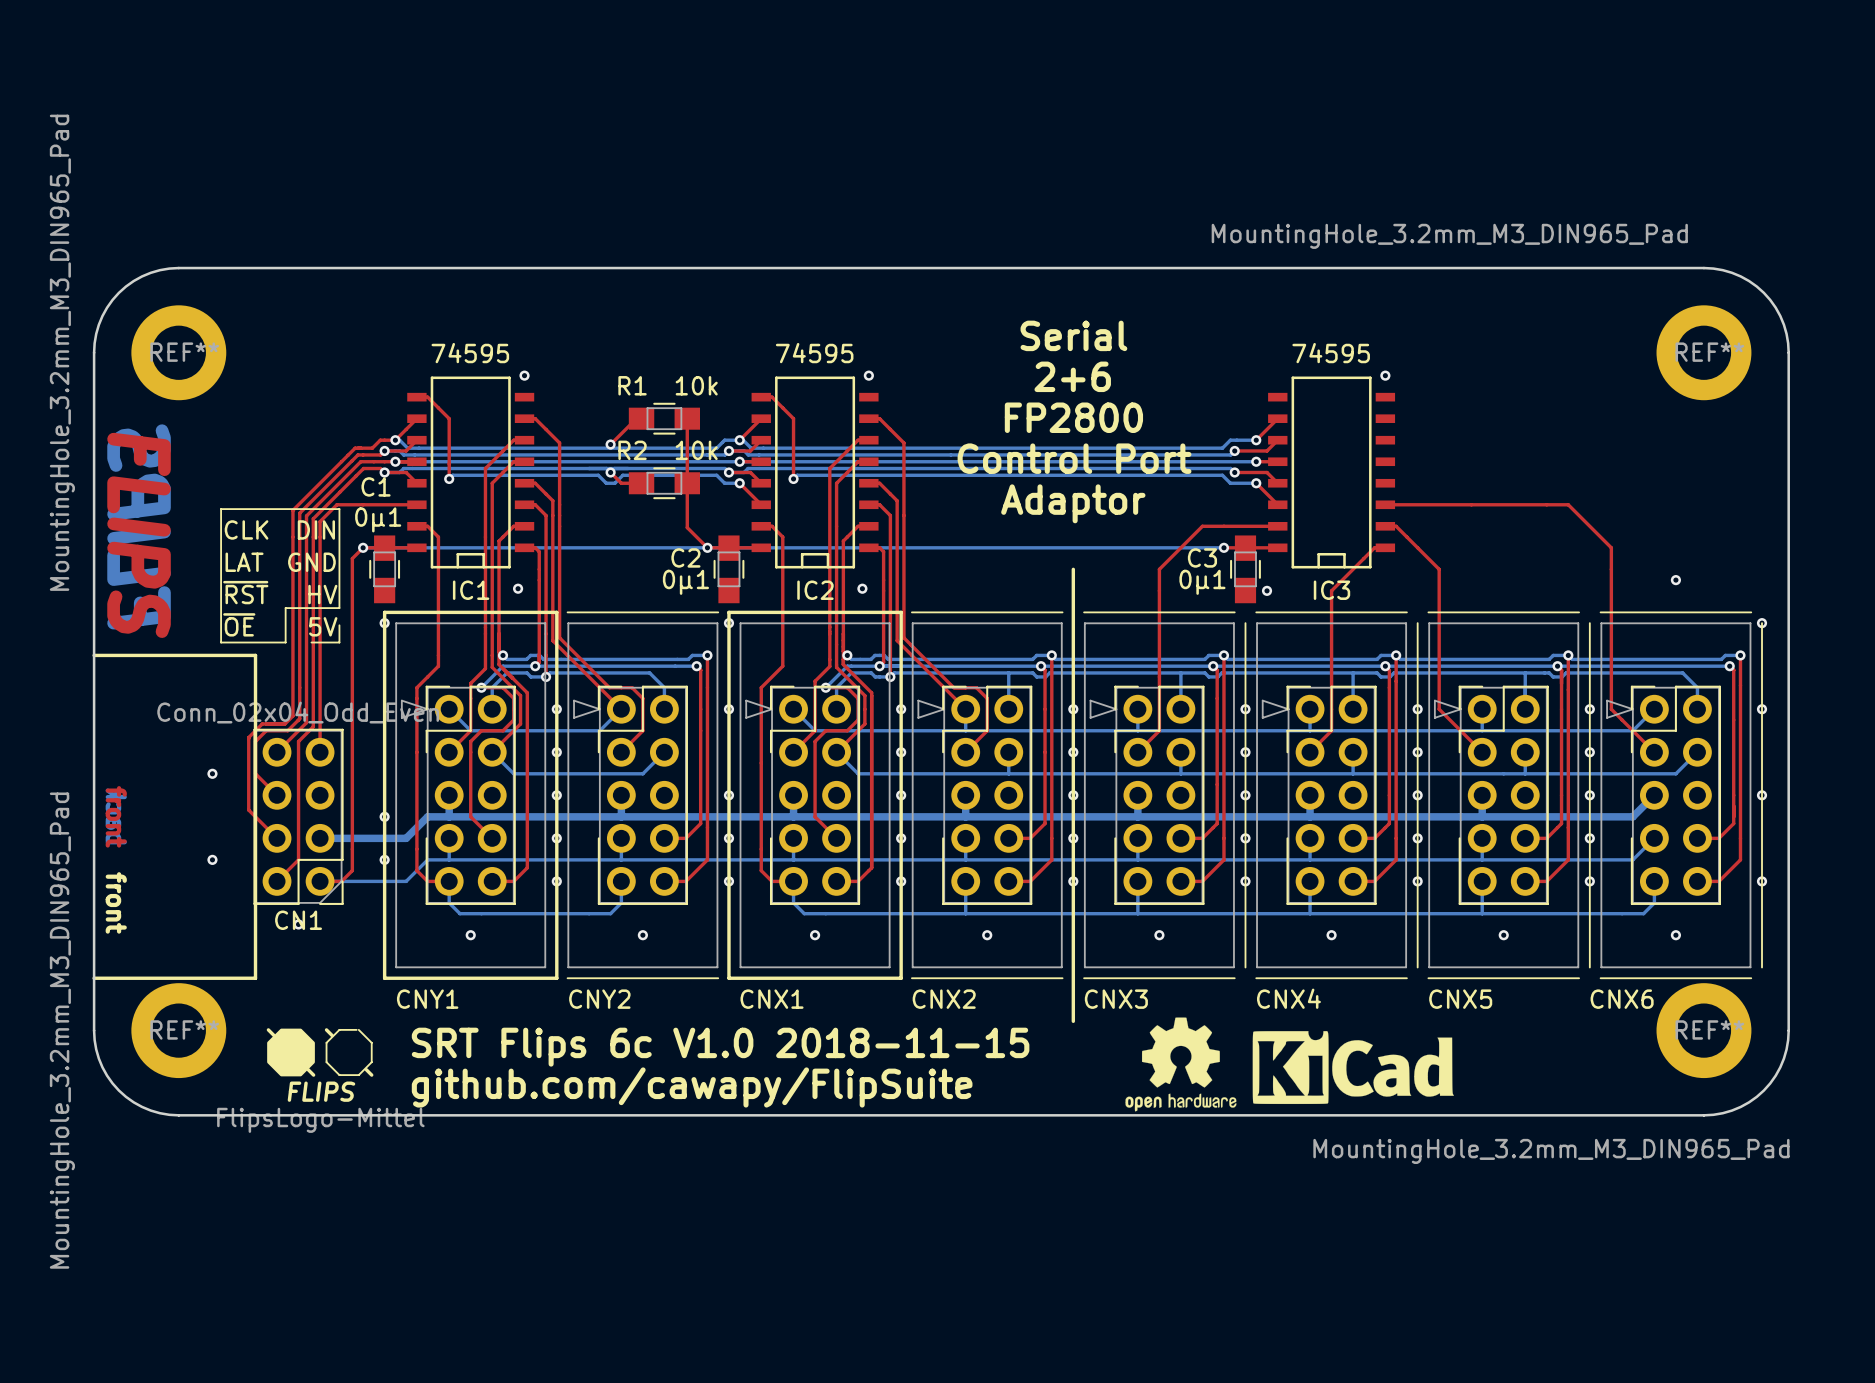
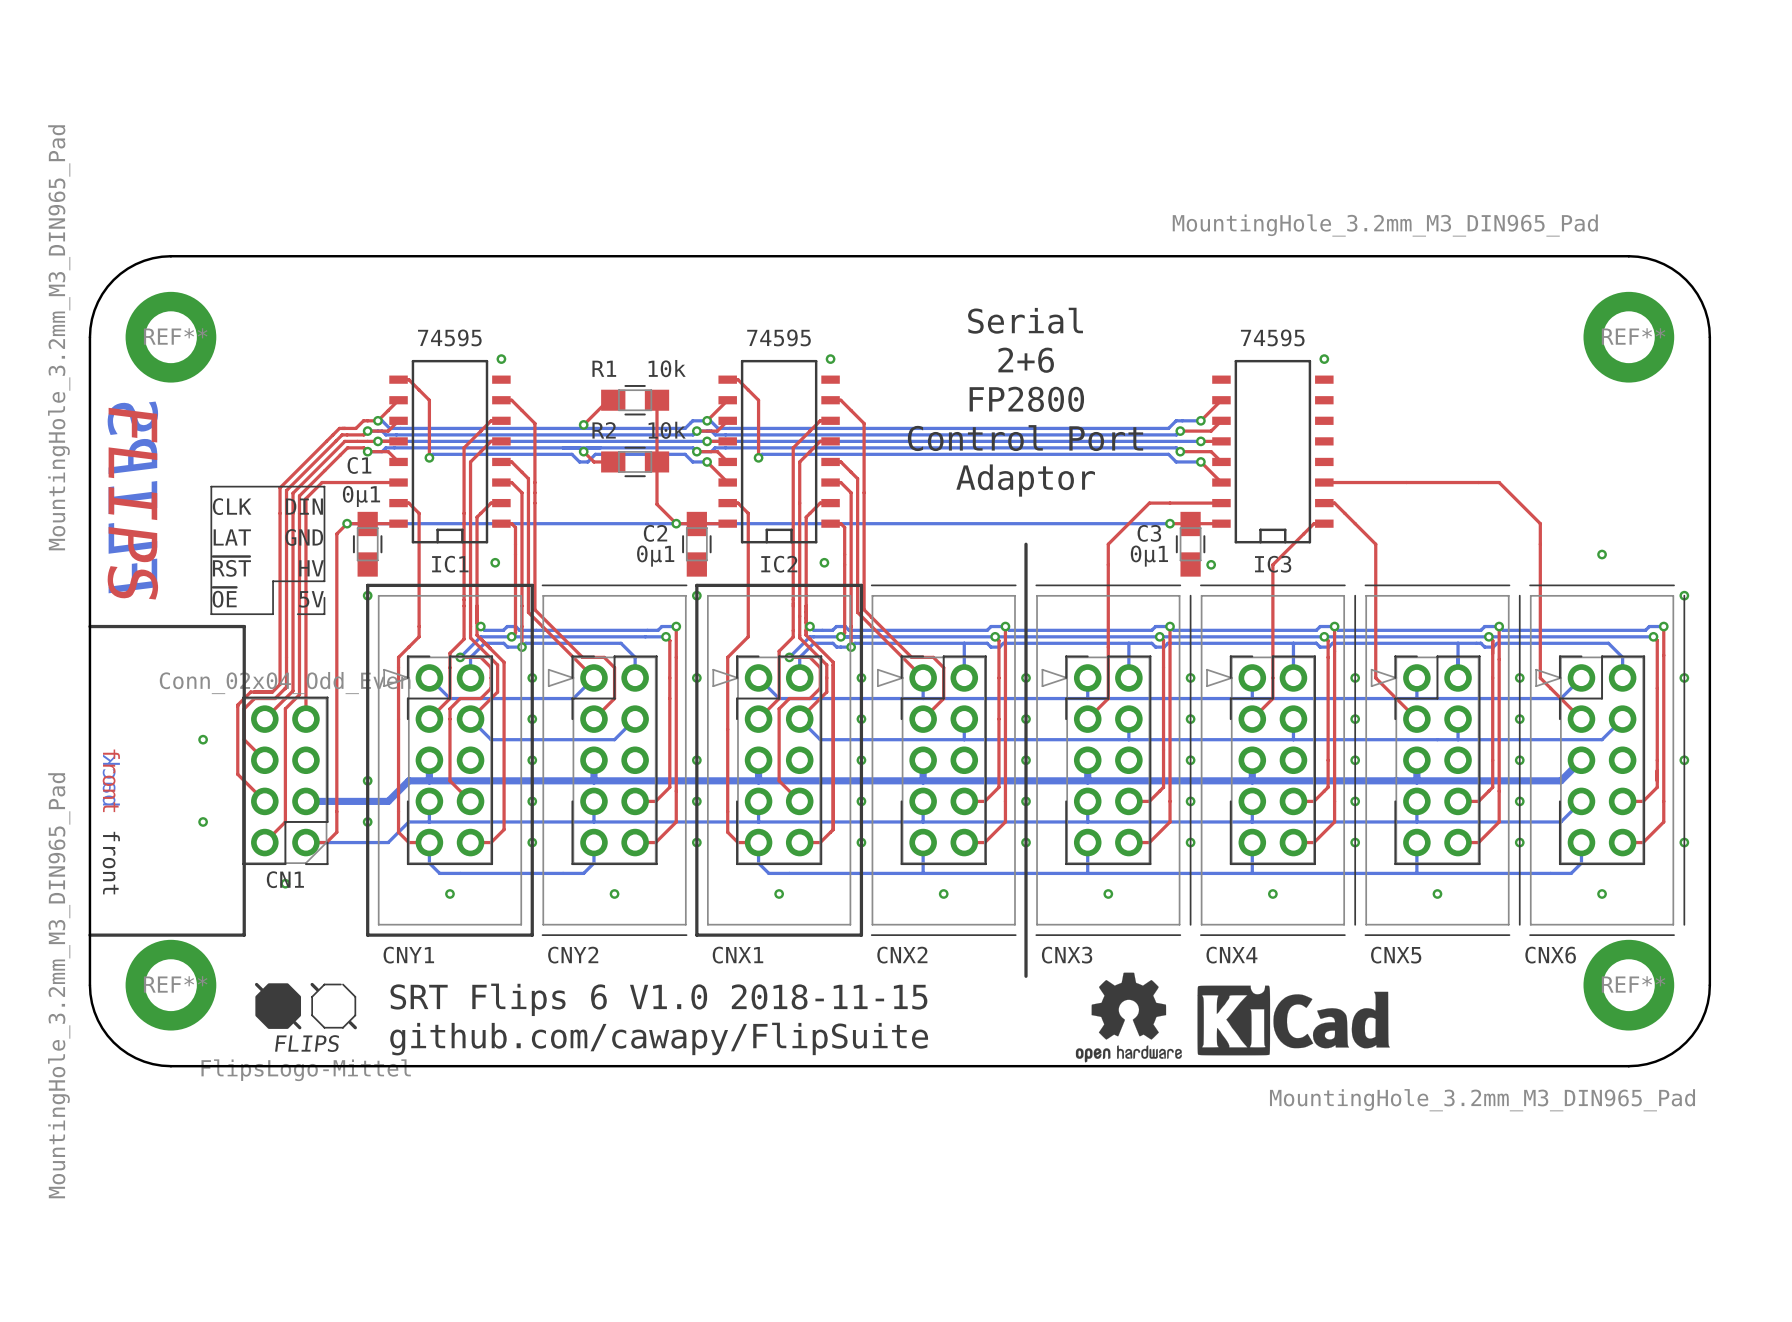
text: SRT Flips 6c V1.0 2018-11-15 (720, 1047) -> SRT Flips 6 V1.0 2018-11-15 (658, 999)

